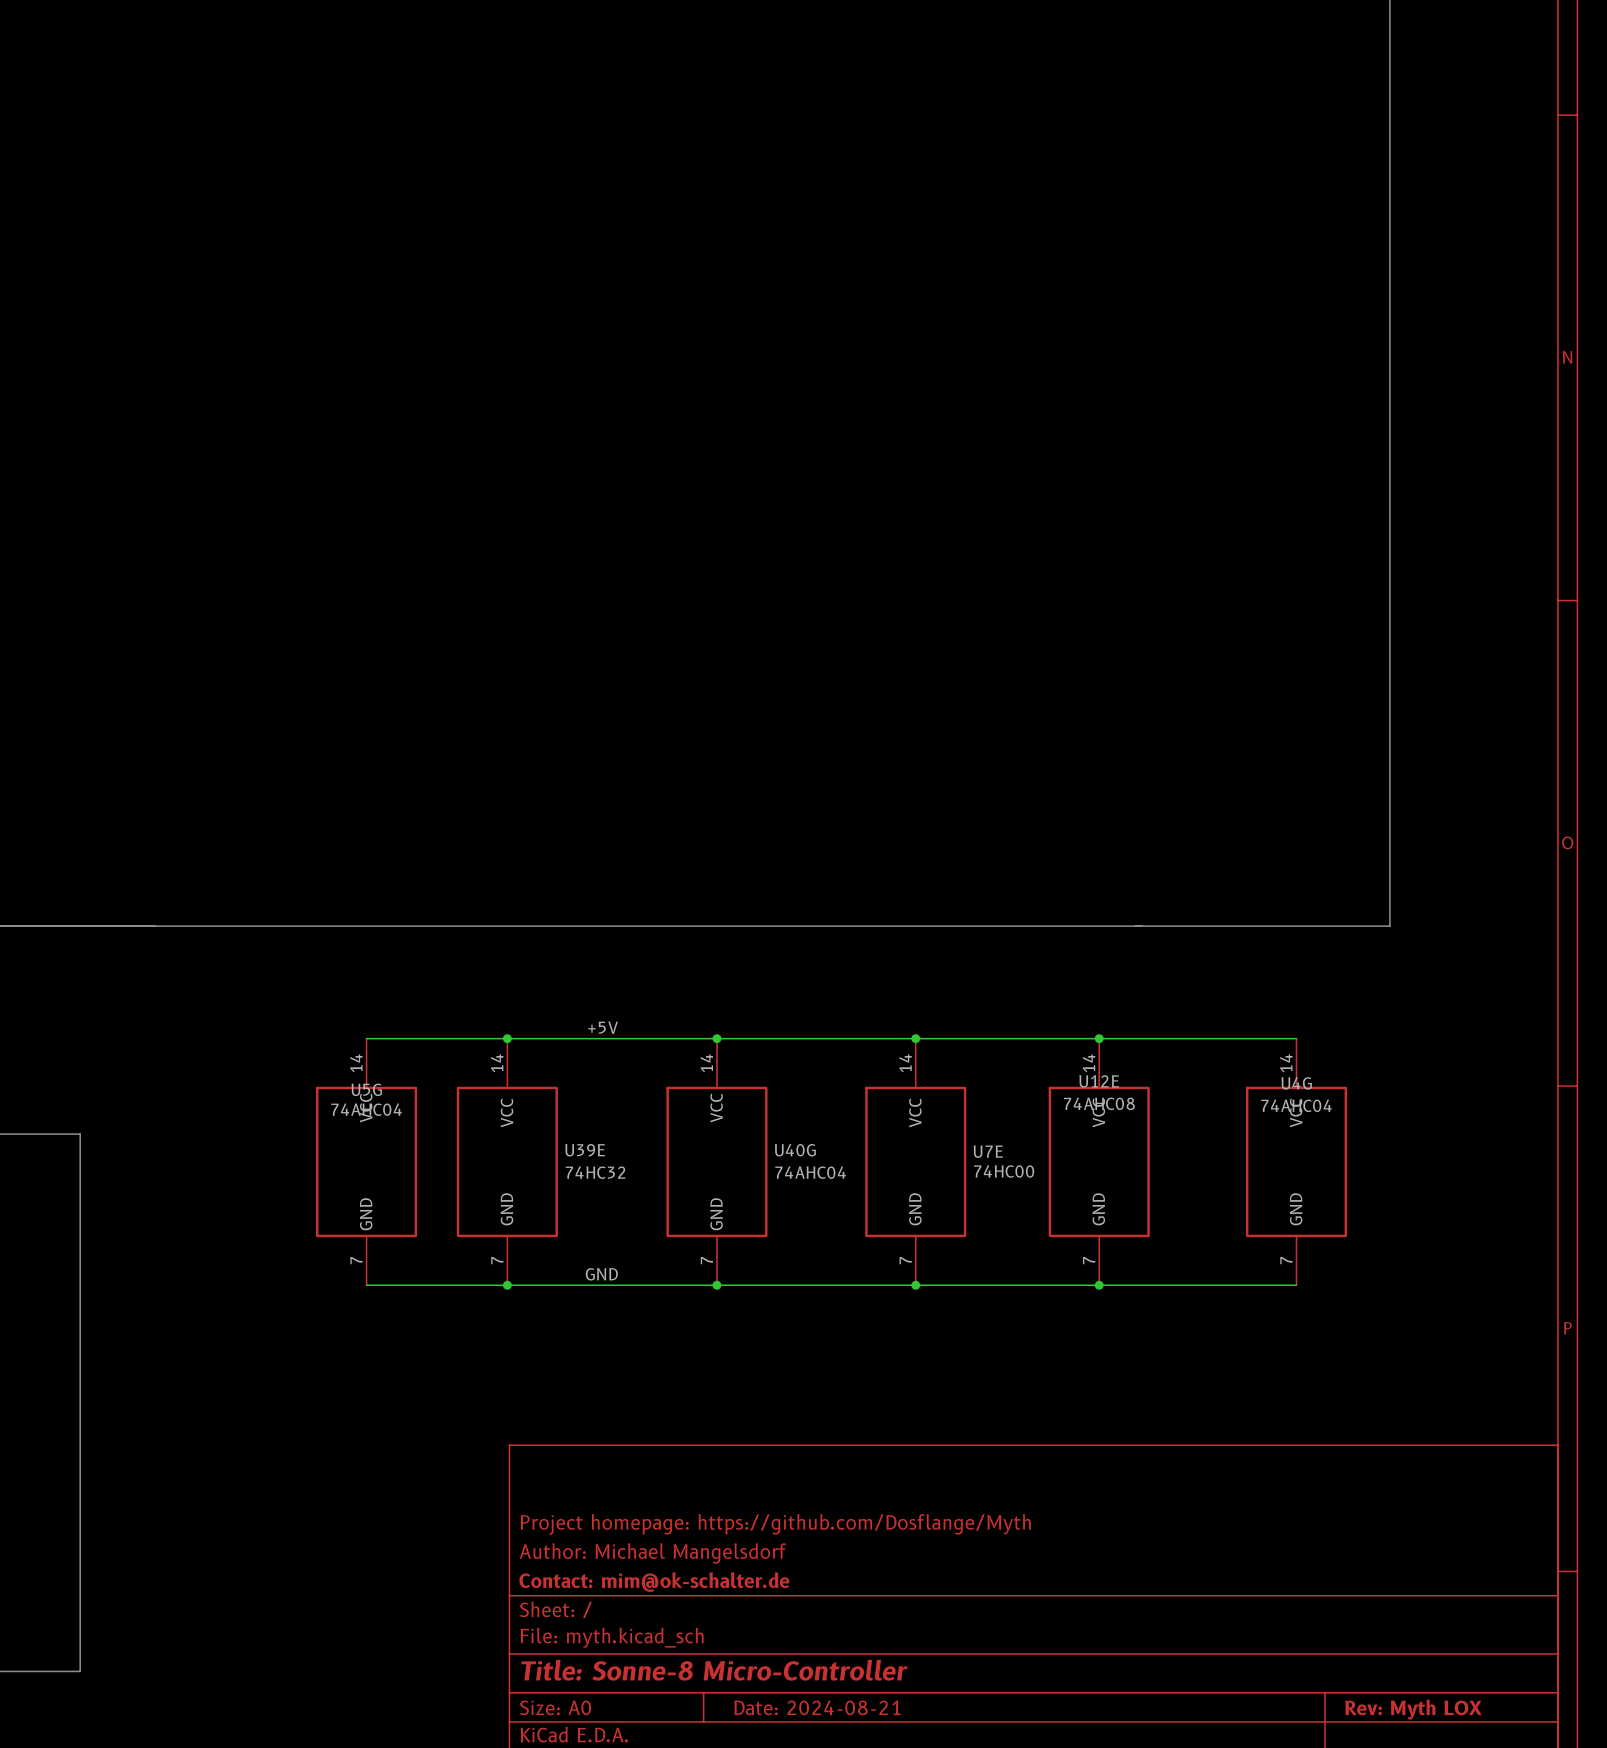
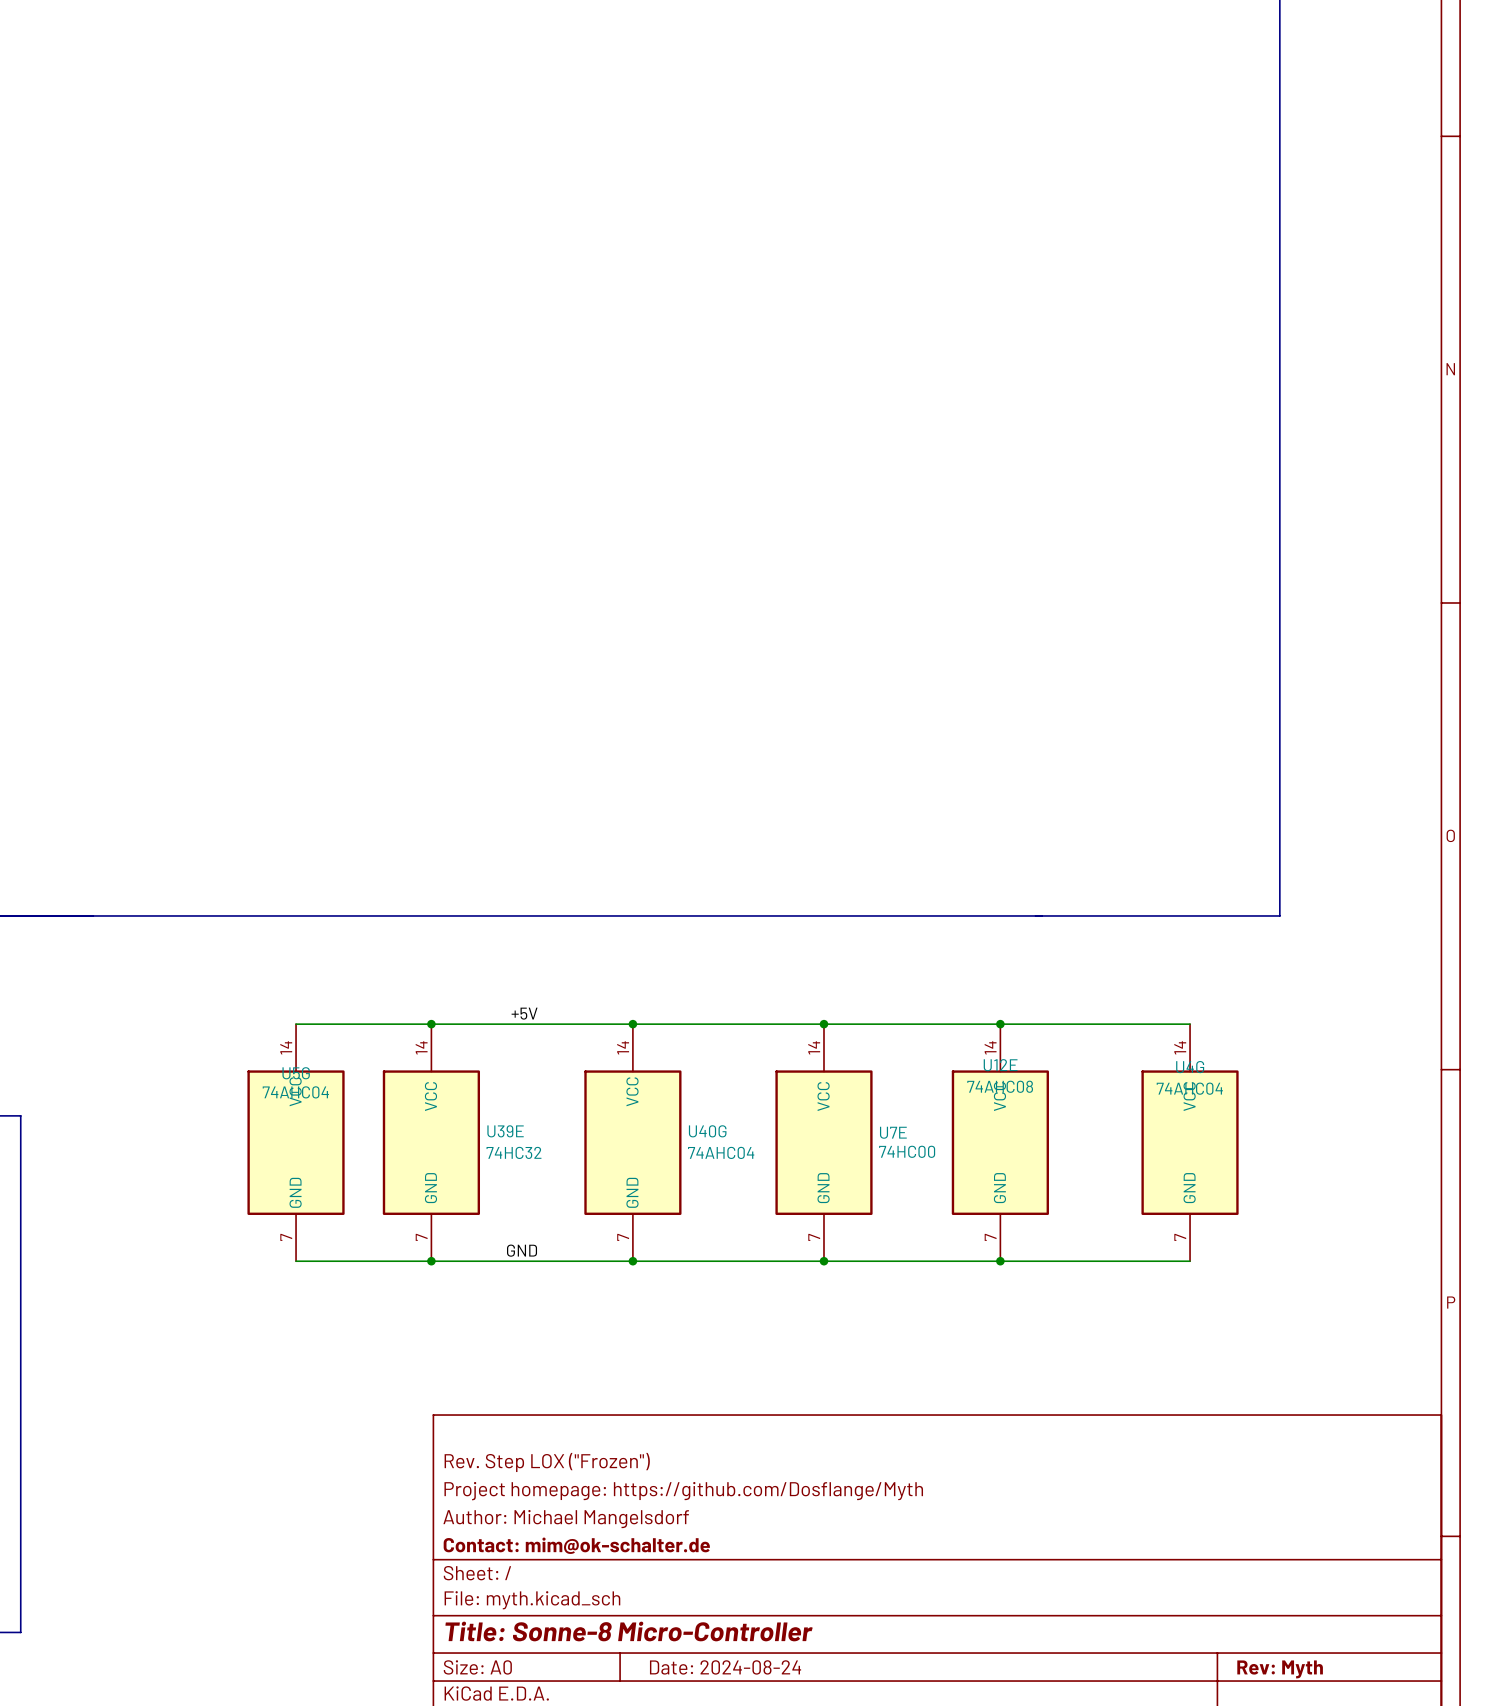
title block: none -> Rev. Step LOX ("Frozen") (547, 1462)
title block: Date: 2024-08-21 (817, 1707) -> Date: 2024-08-24 (725, 1667)
title block: Rev: Myth LOX (1413, 1709) -> Rev: Myth (1280, 1669)

